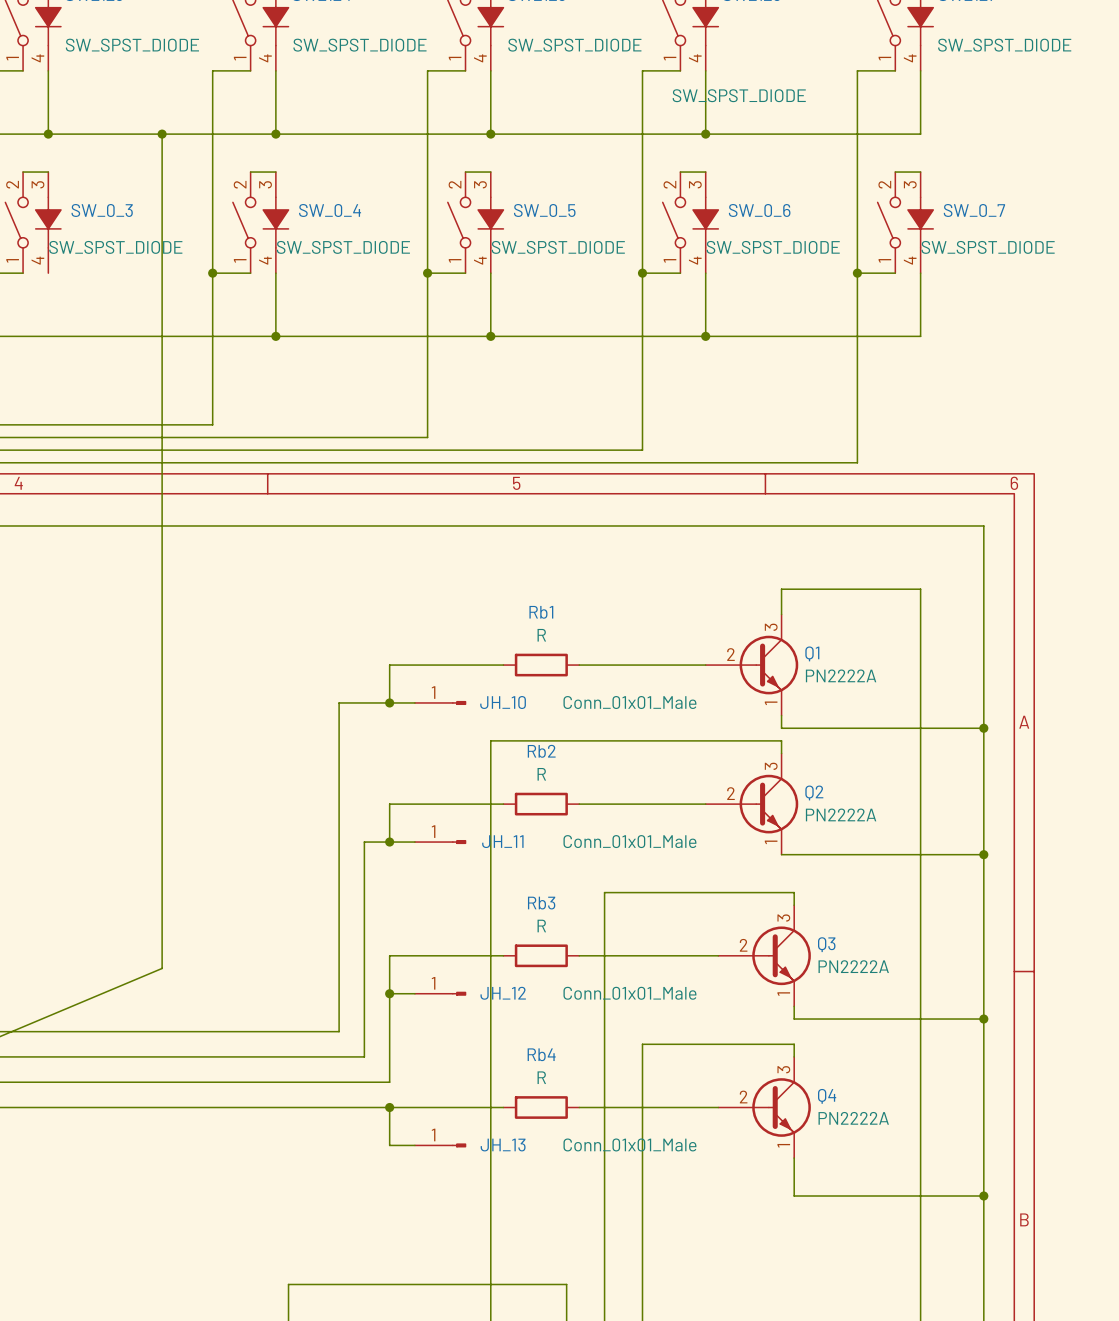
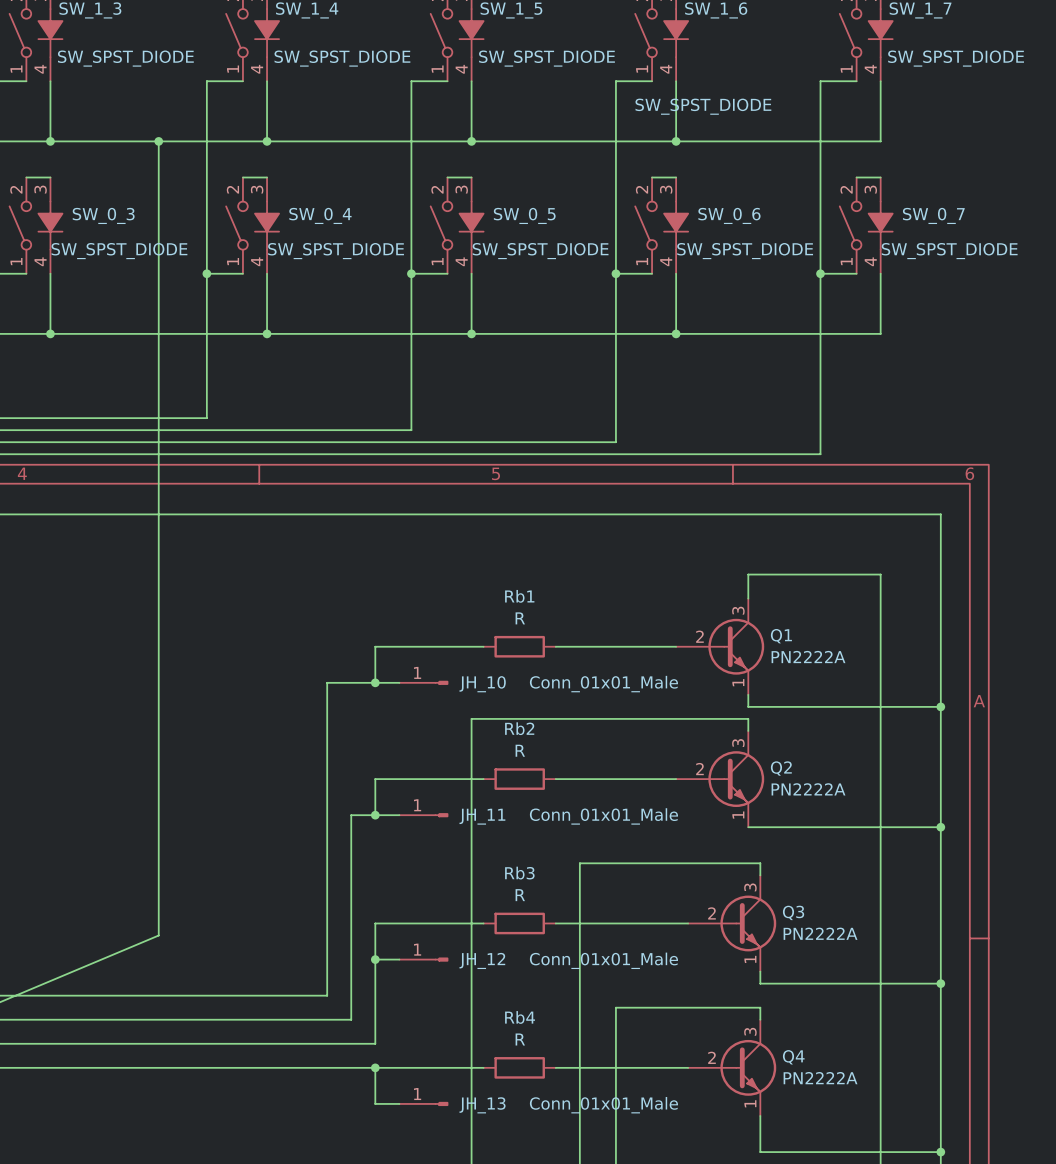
wire: none -> (50, 273) (50, 333)
junction: none -> (50, 333)

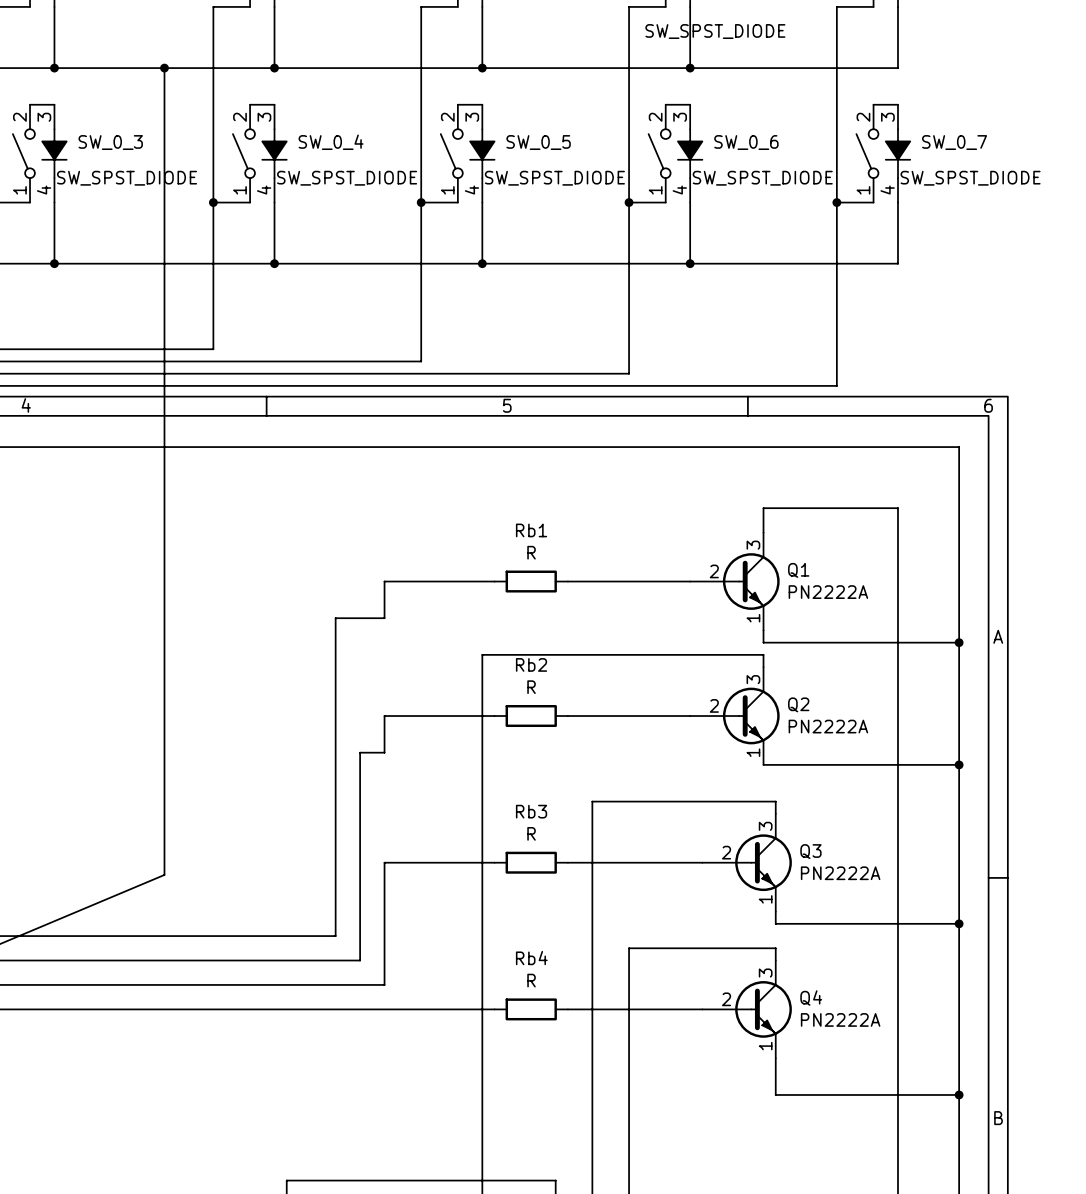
wire: (375, 682) (399, 682) -> none
junction: (375, 682) -> none
JH_10: Conn_01x01_Male (423, 682) -> none
wire: (375, 815) (399, 815) -> none
junction: (375, 815) -> none
JH_11: Conn_01x01_Male (423, 815) -> none
wire: (375, 959) (399, 959) -> none
junction: (375, 959) -> none
JH_12: Conn_01x01_Male (423, 959) -> none
wire: (375, 1067) (375, 1103) (399, 1103) -> none
junction: (375, 1067) -> none
JH_13: Conn_01x01_Male (423, 1103) -> none

